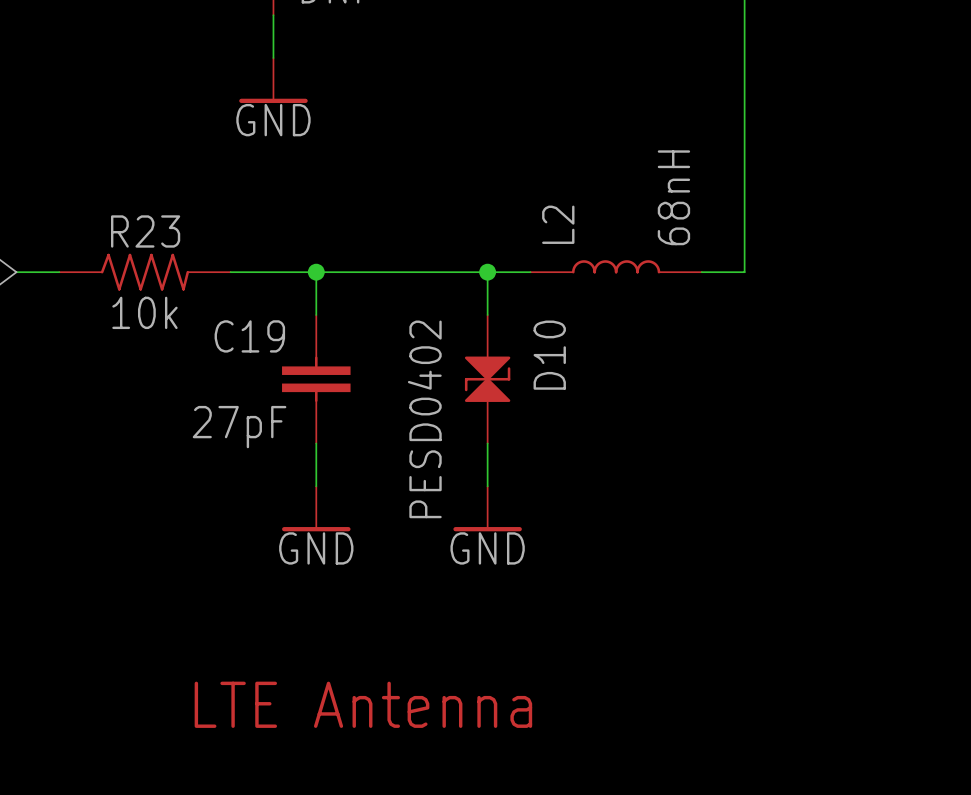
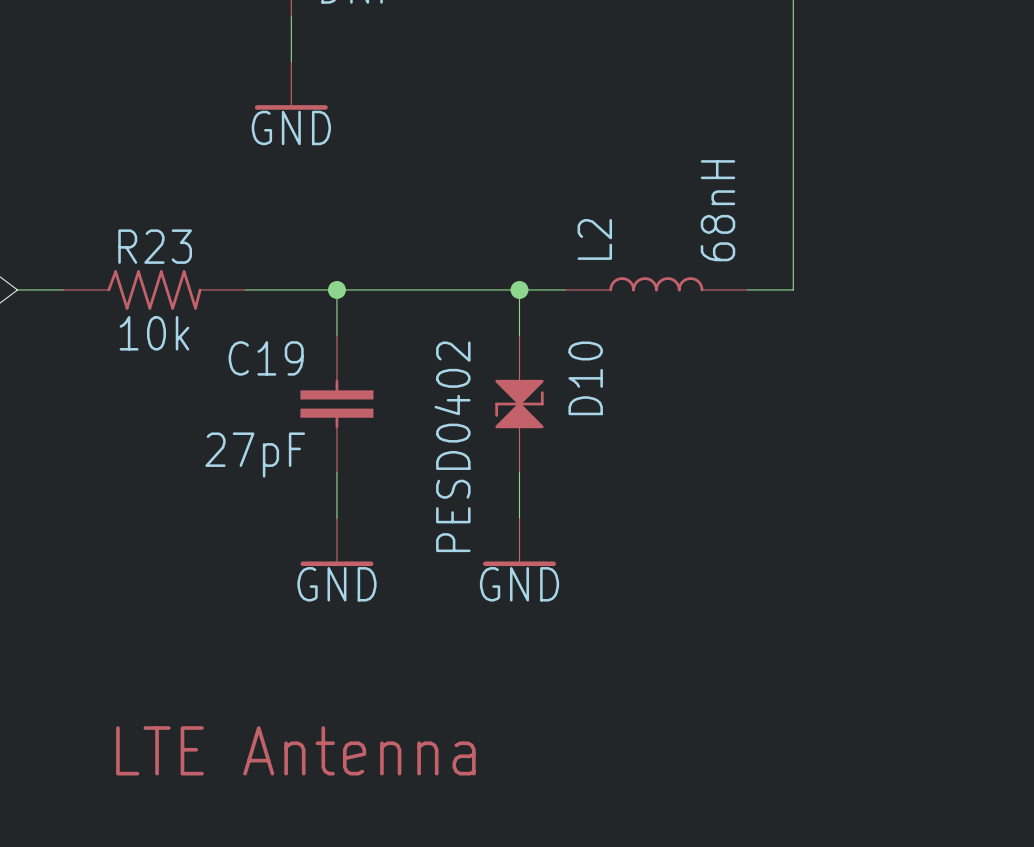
text position: LTE Antenna (363, 704) -> LTE Antenna (295, 750)

